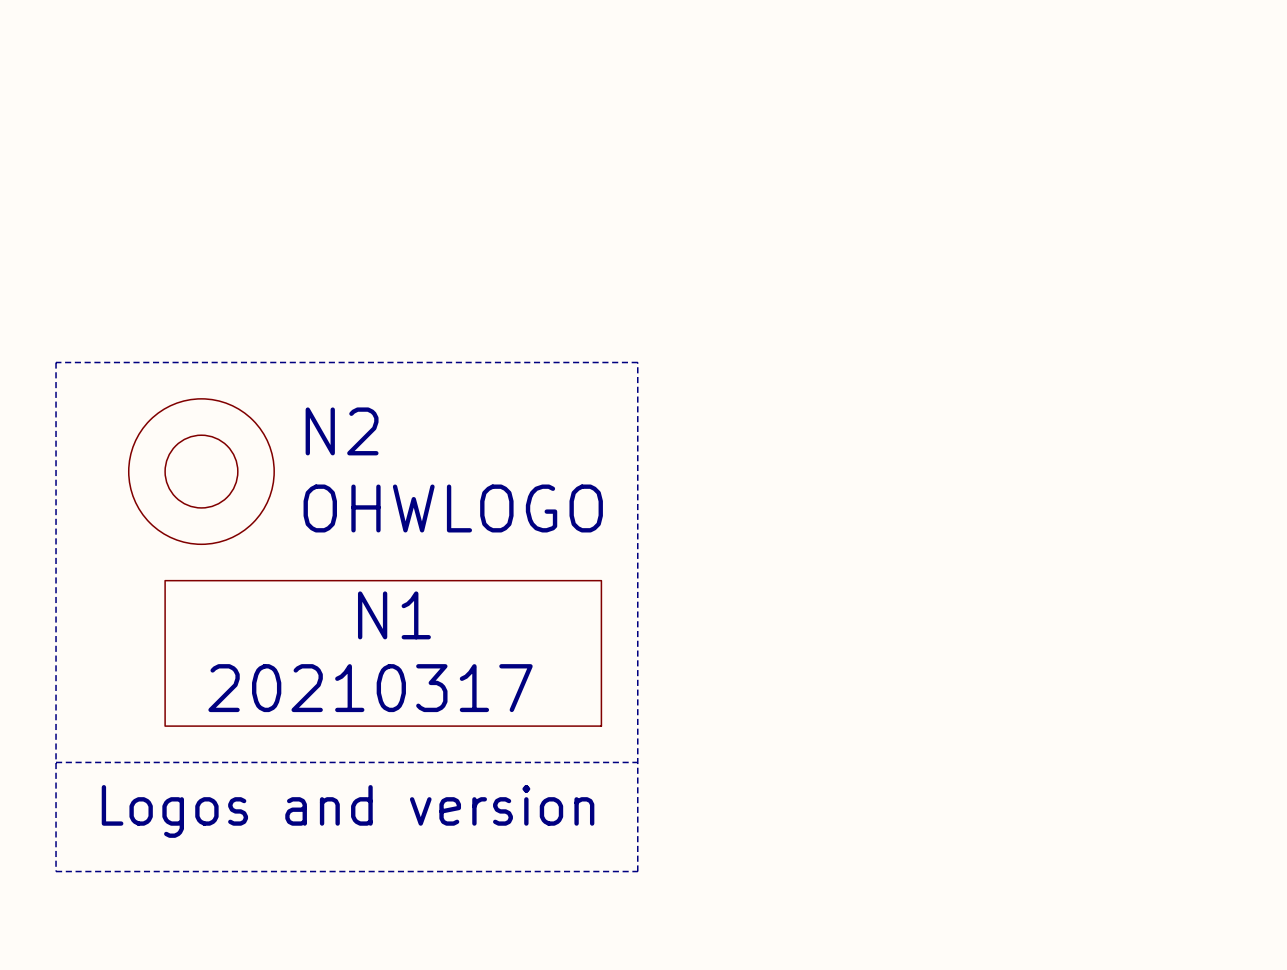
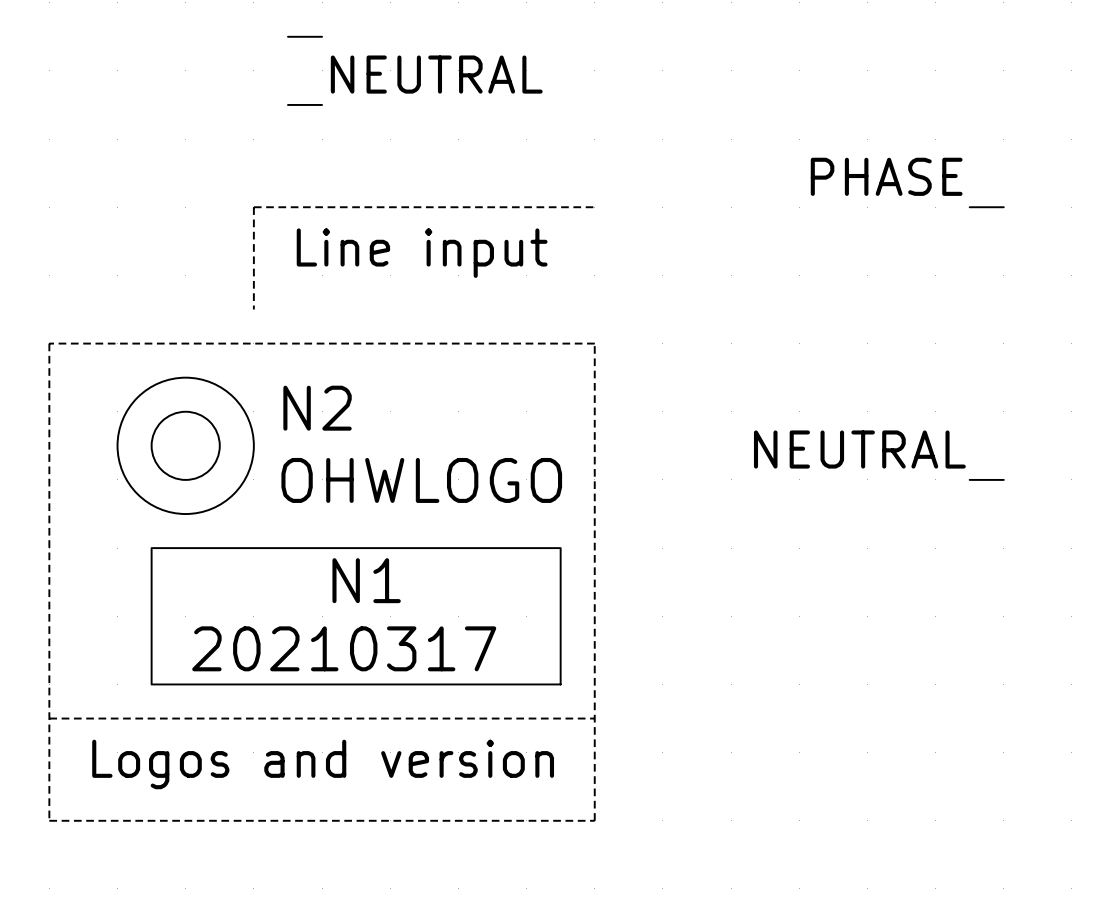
wire: none -> (287, 36) (322, 36)
label: none -> NEUTRAL (436, 74)
wire: none -> (287, 104) (322, 104)
label: none -> PHASE (886, 176)
line: none -> (594, 207) (253, 207) (253, 309)
wire: none -> (969, 207) (1003, 207)
text: none -> Line input (422, 253)
label: none -> NEUTRAL (859, 449)
wire: none -> (969, 479) (1003, 479)

